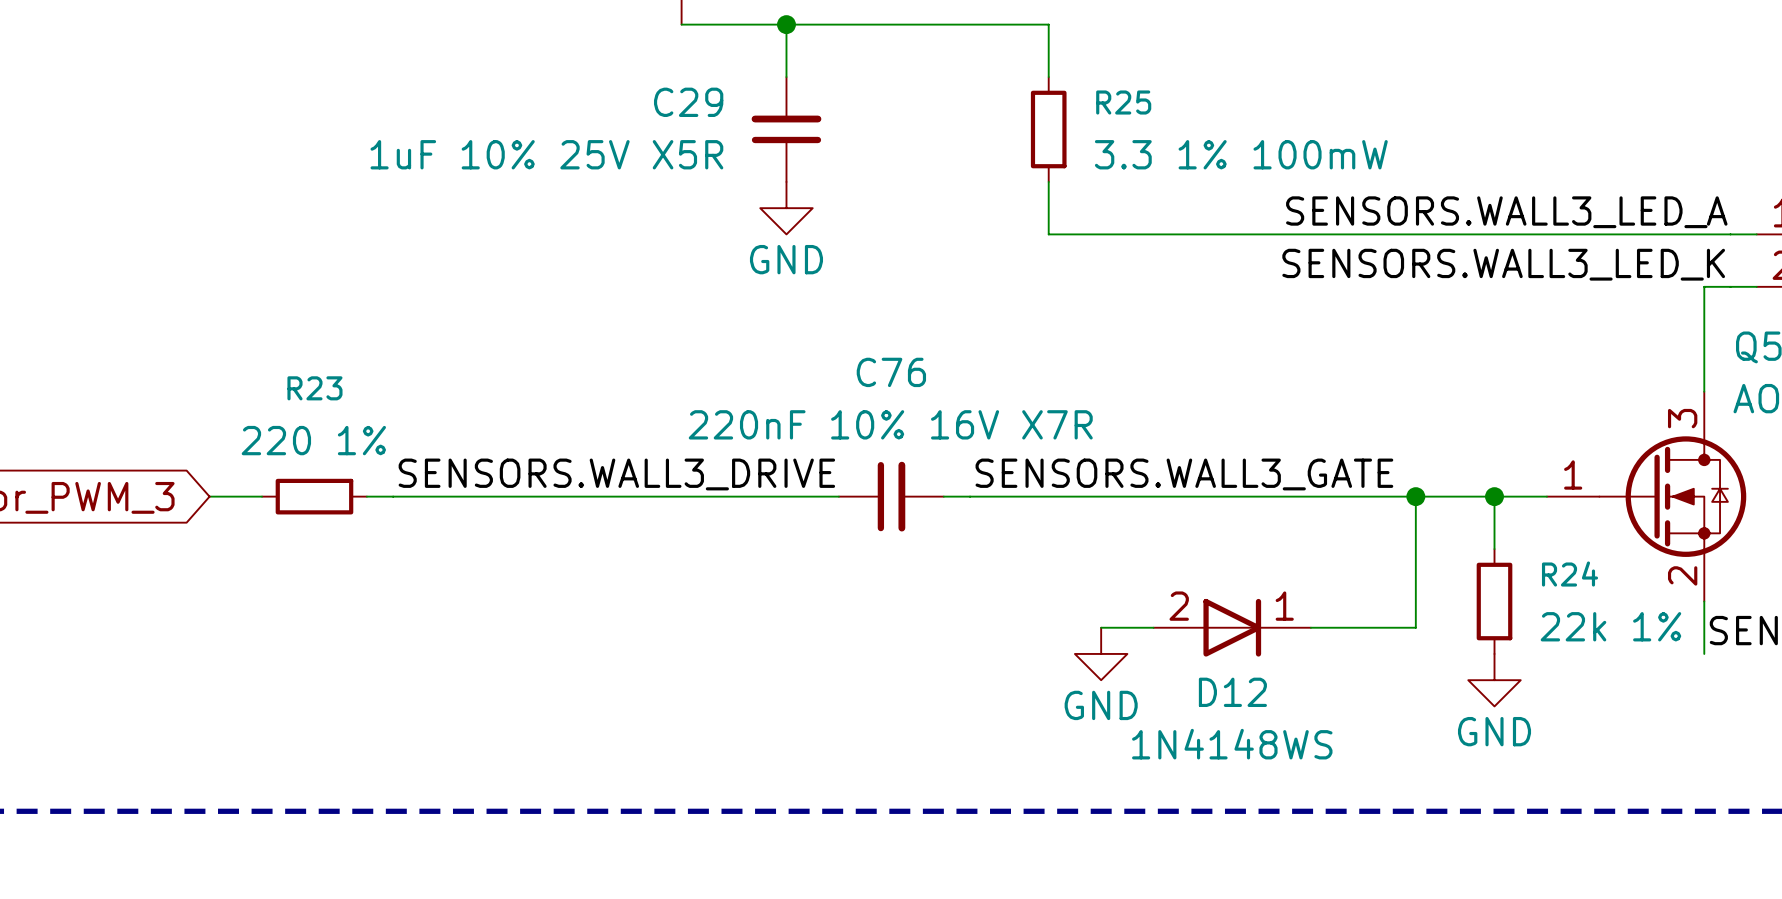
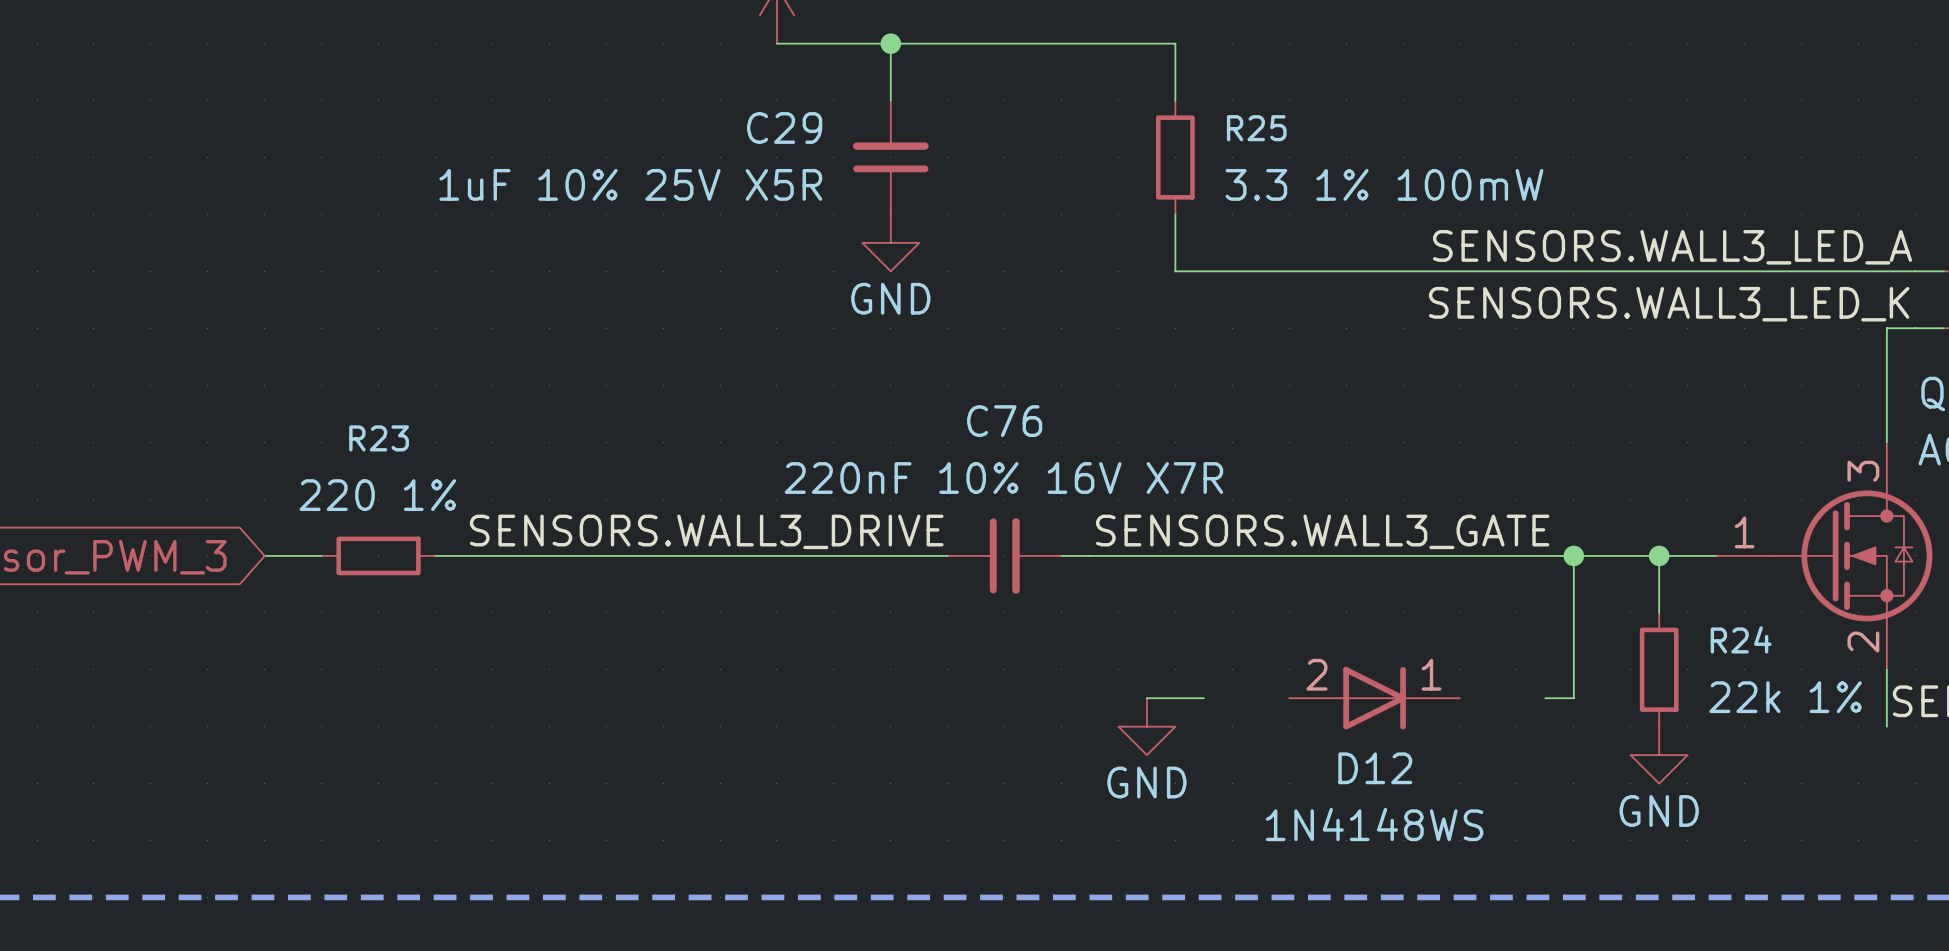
wire: (1101, 627) (1153, 627) -> (1146, 698) (1203, 698)
wire: (1310, 627) (1389, 627) -> none
power symbol position: GND (1101, 653) -> GND (1146, 726)

